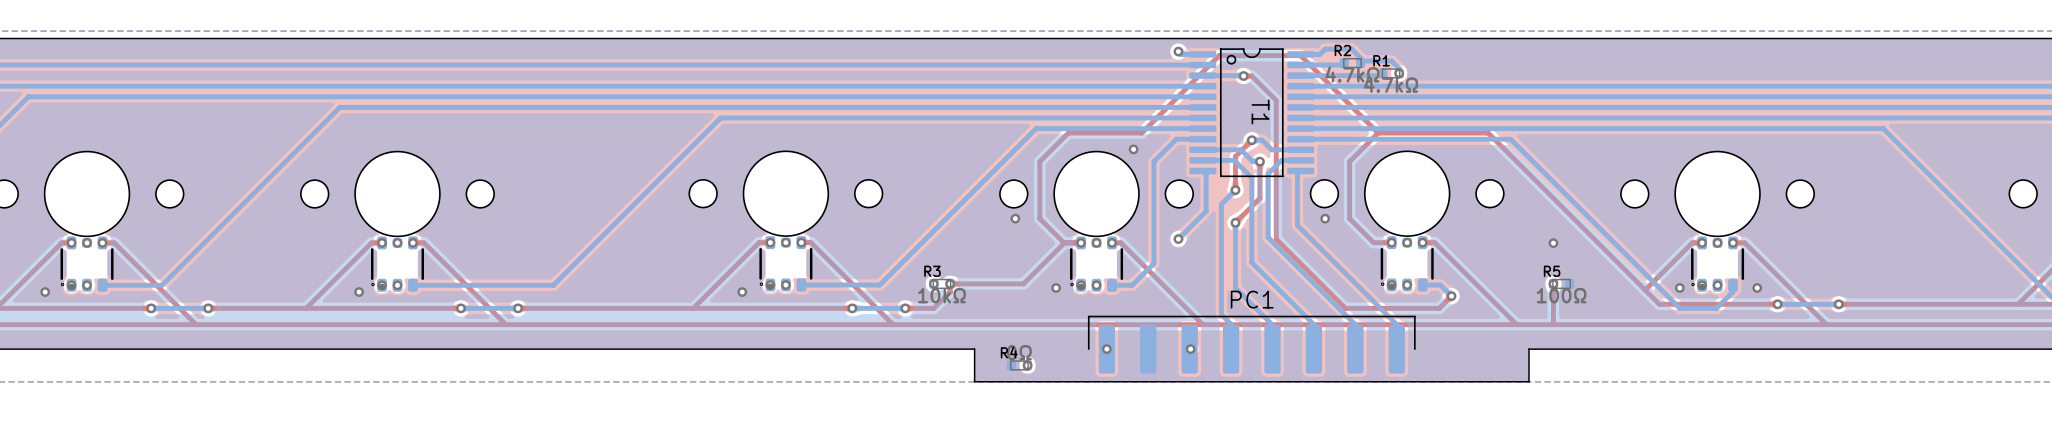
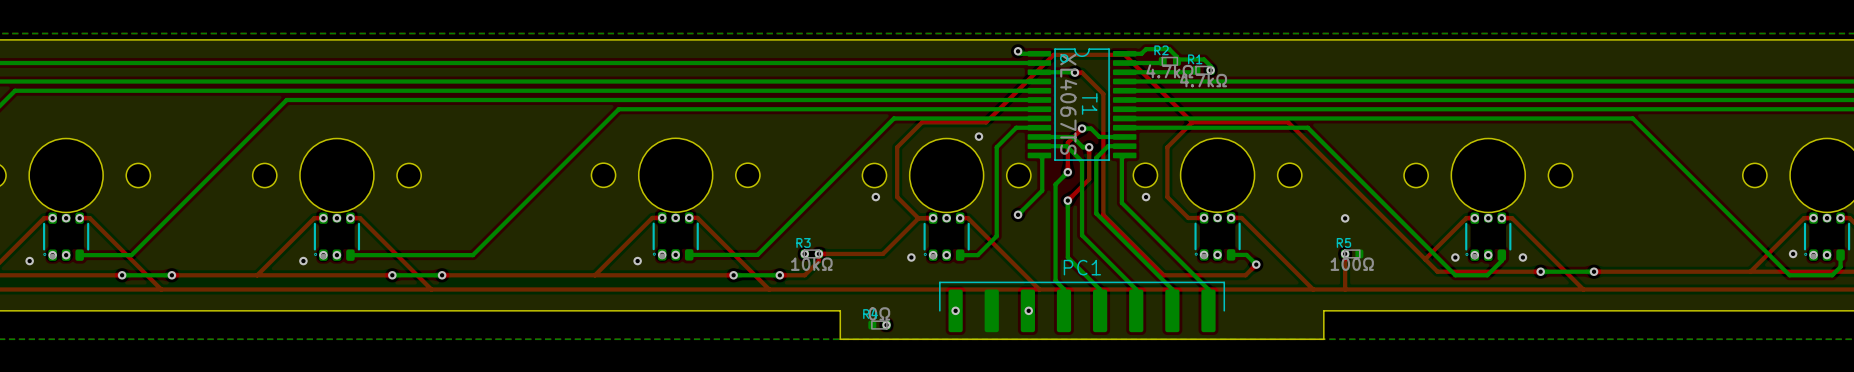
T1 value: none -> XL4067TS (1068, 104)

